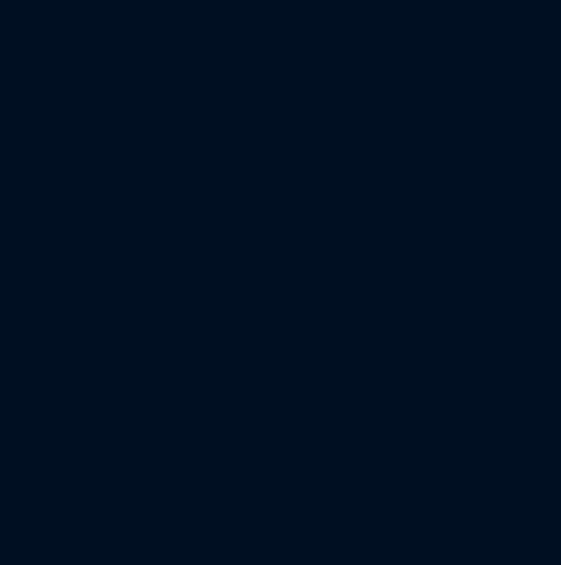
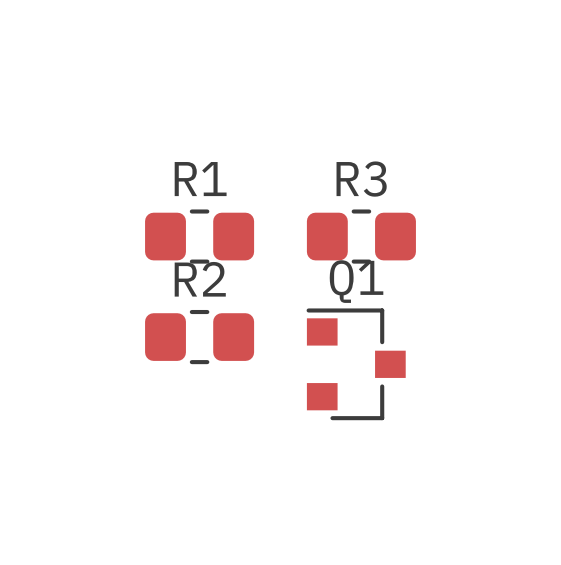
R1: none -> (199, 236)
R3: none -> (361, 236)
R2: none -> (199, 337)
Q1: none -> (356, 364)

